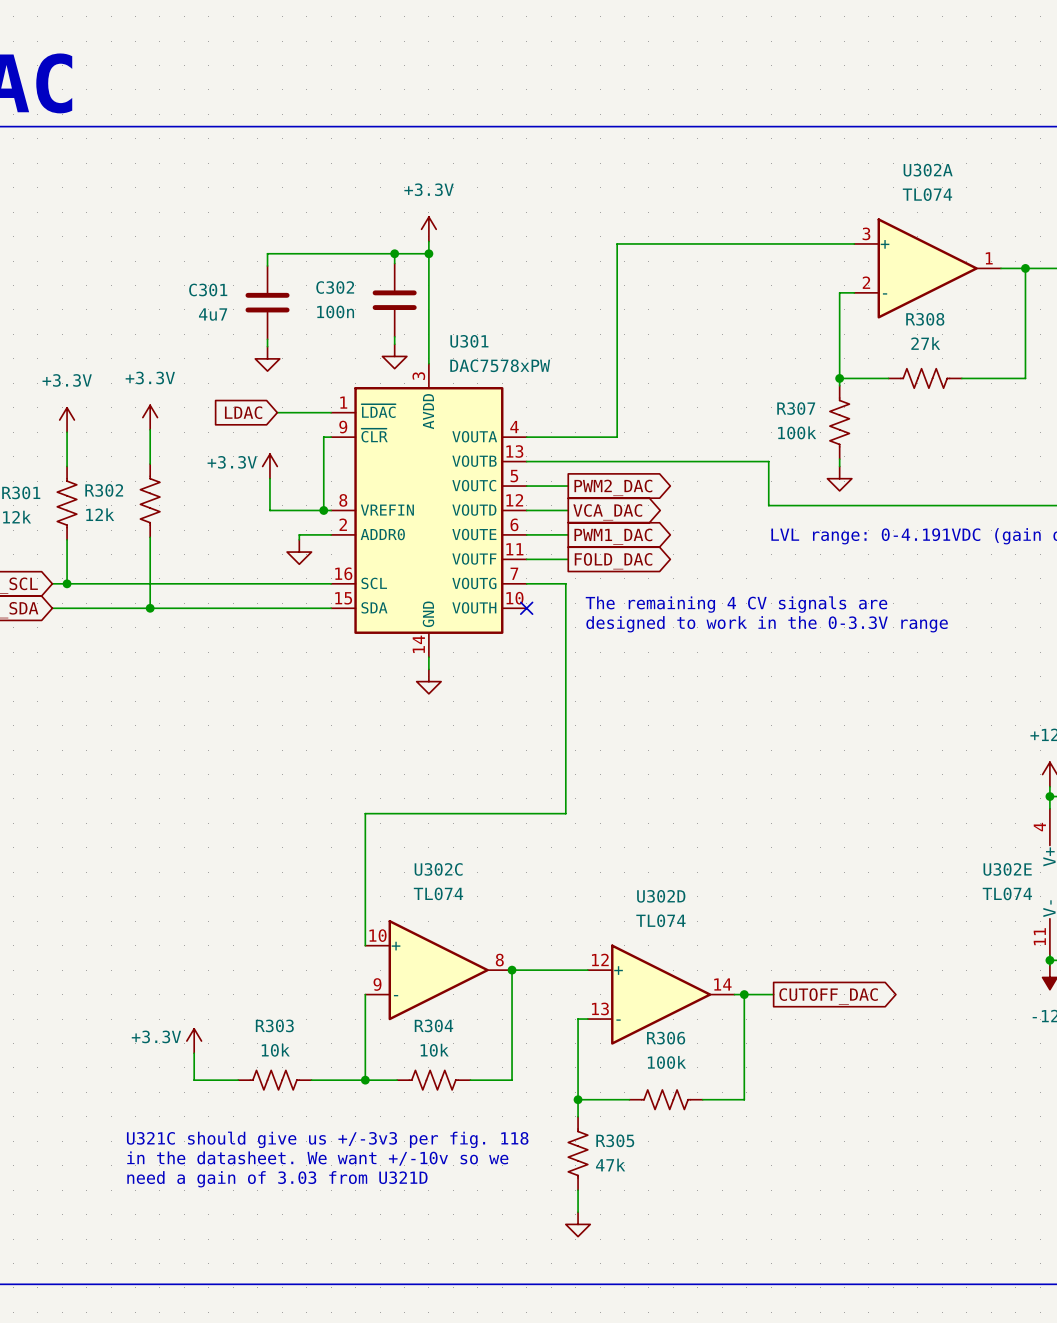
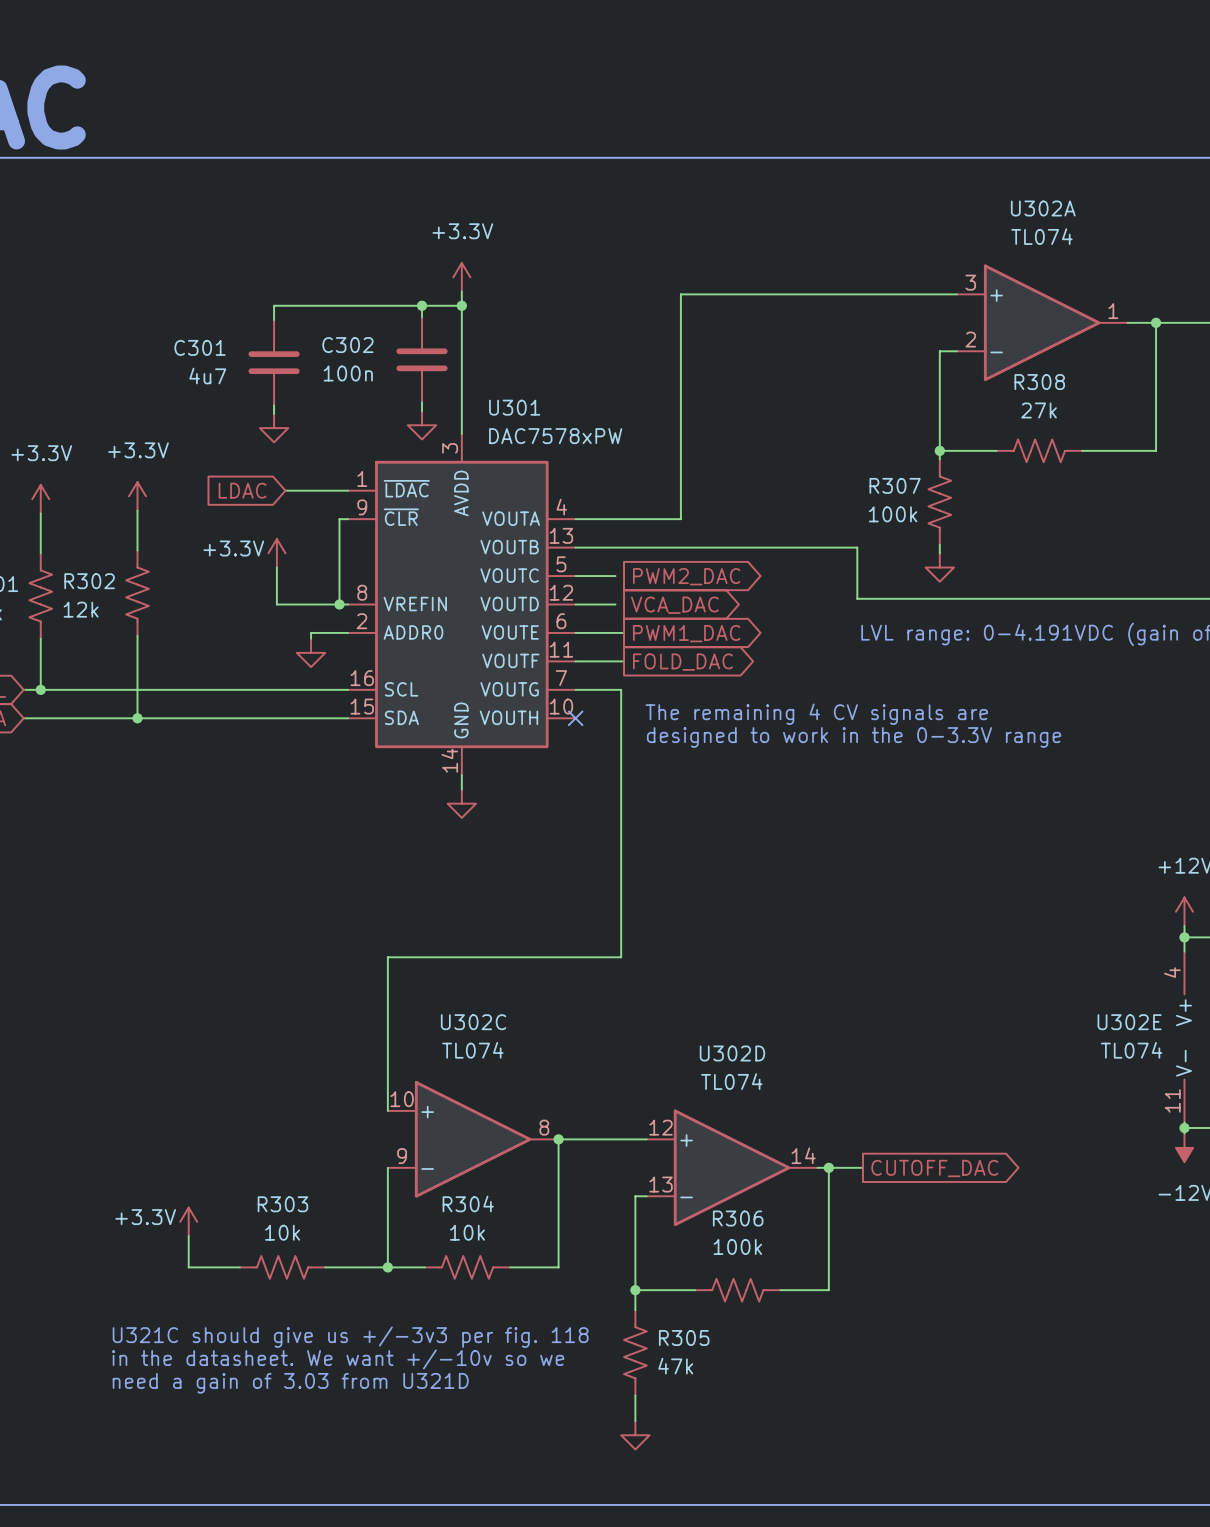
wire: (560, 486) (568, 486) -> none
wire: (560, 510) (568, 510) -> none

